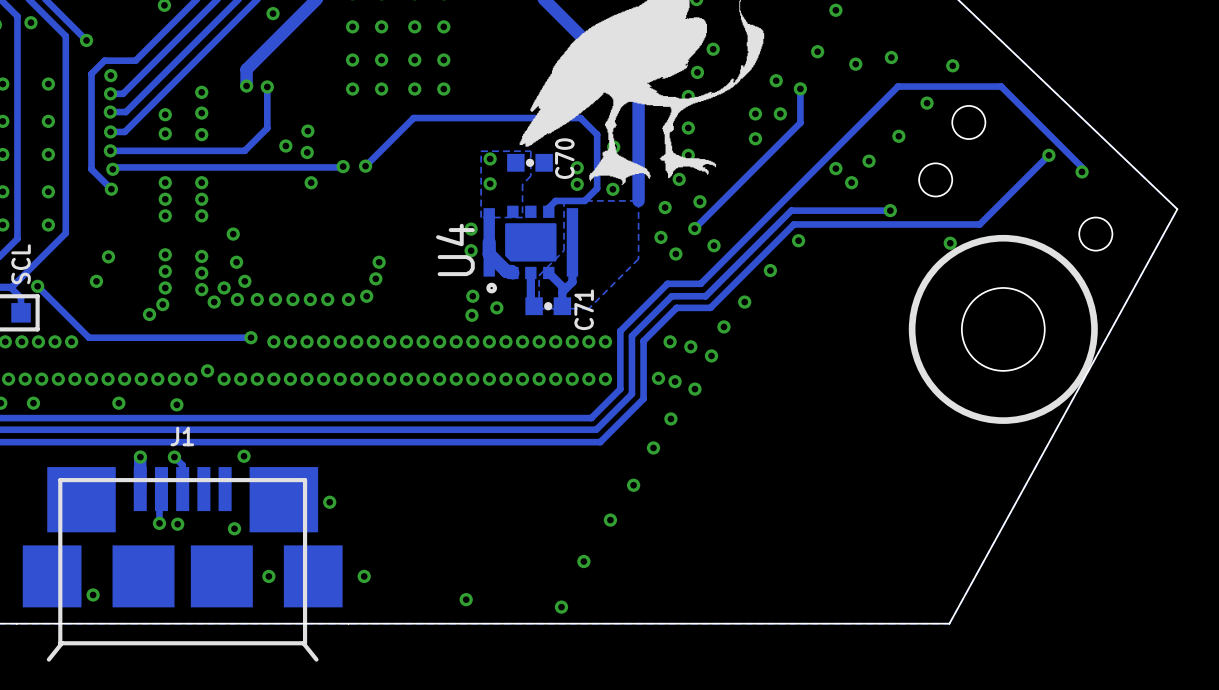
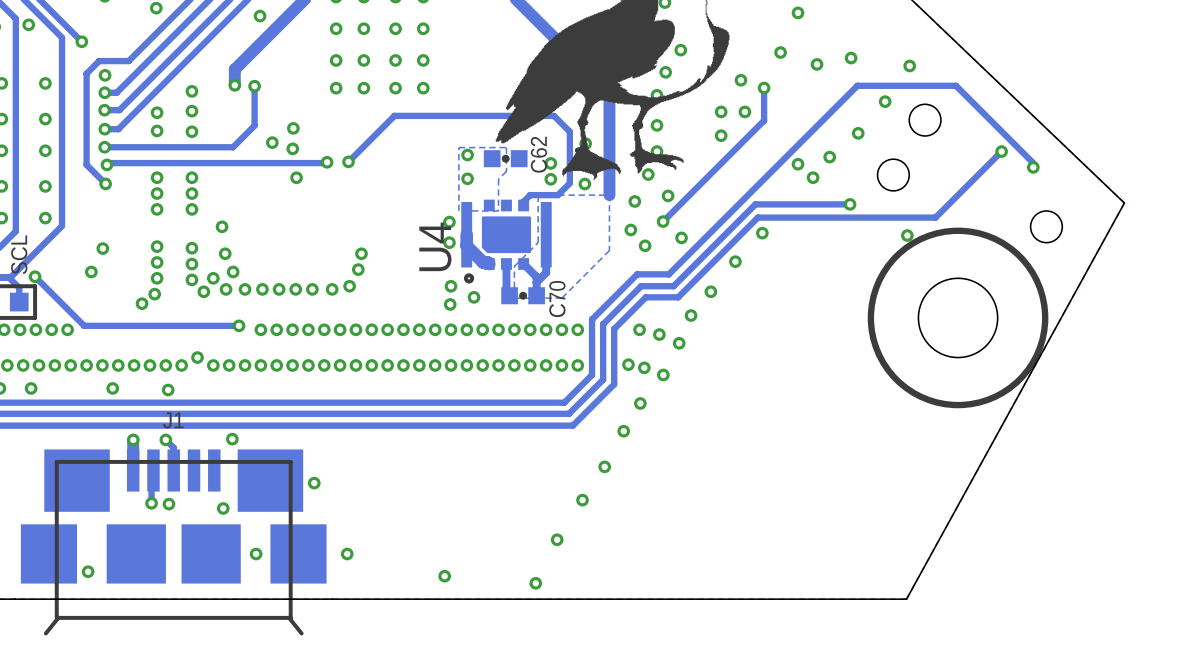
C70 name: C70 (564, 158) -> C62 (538, 154)
C71 name: C71 (584, 309) -> C70 (557, 299)

